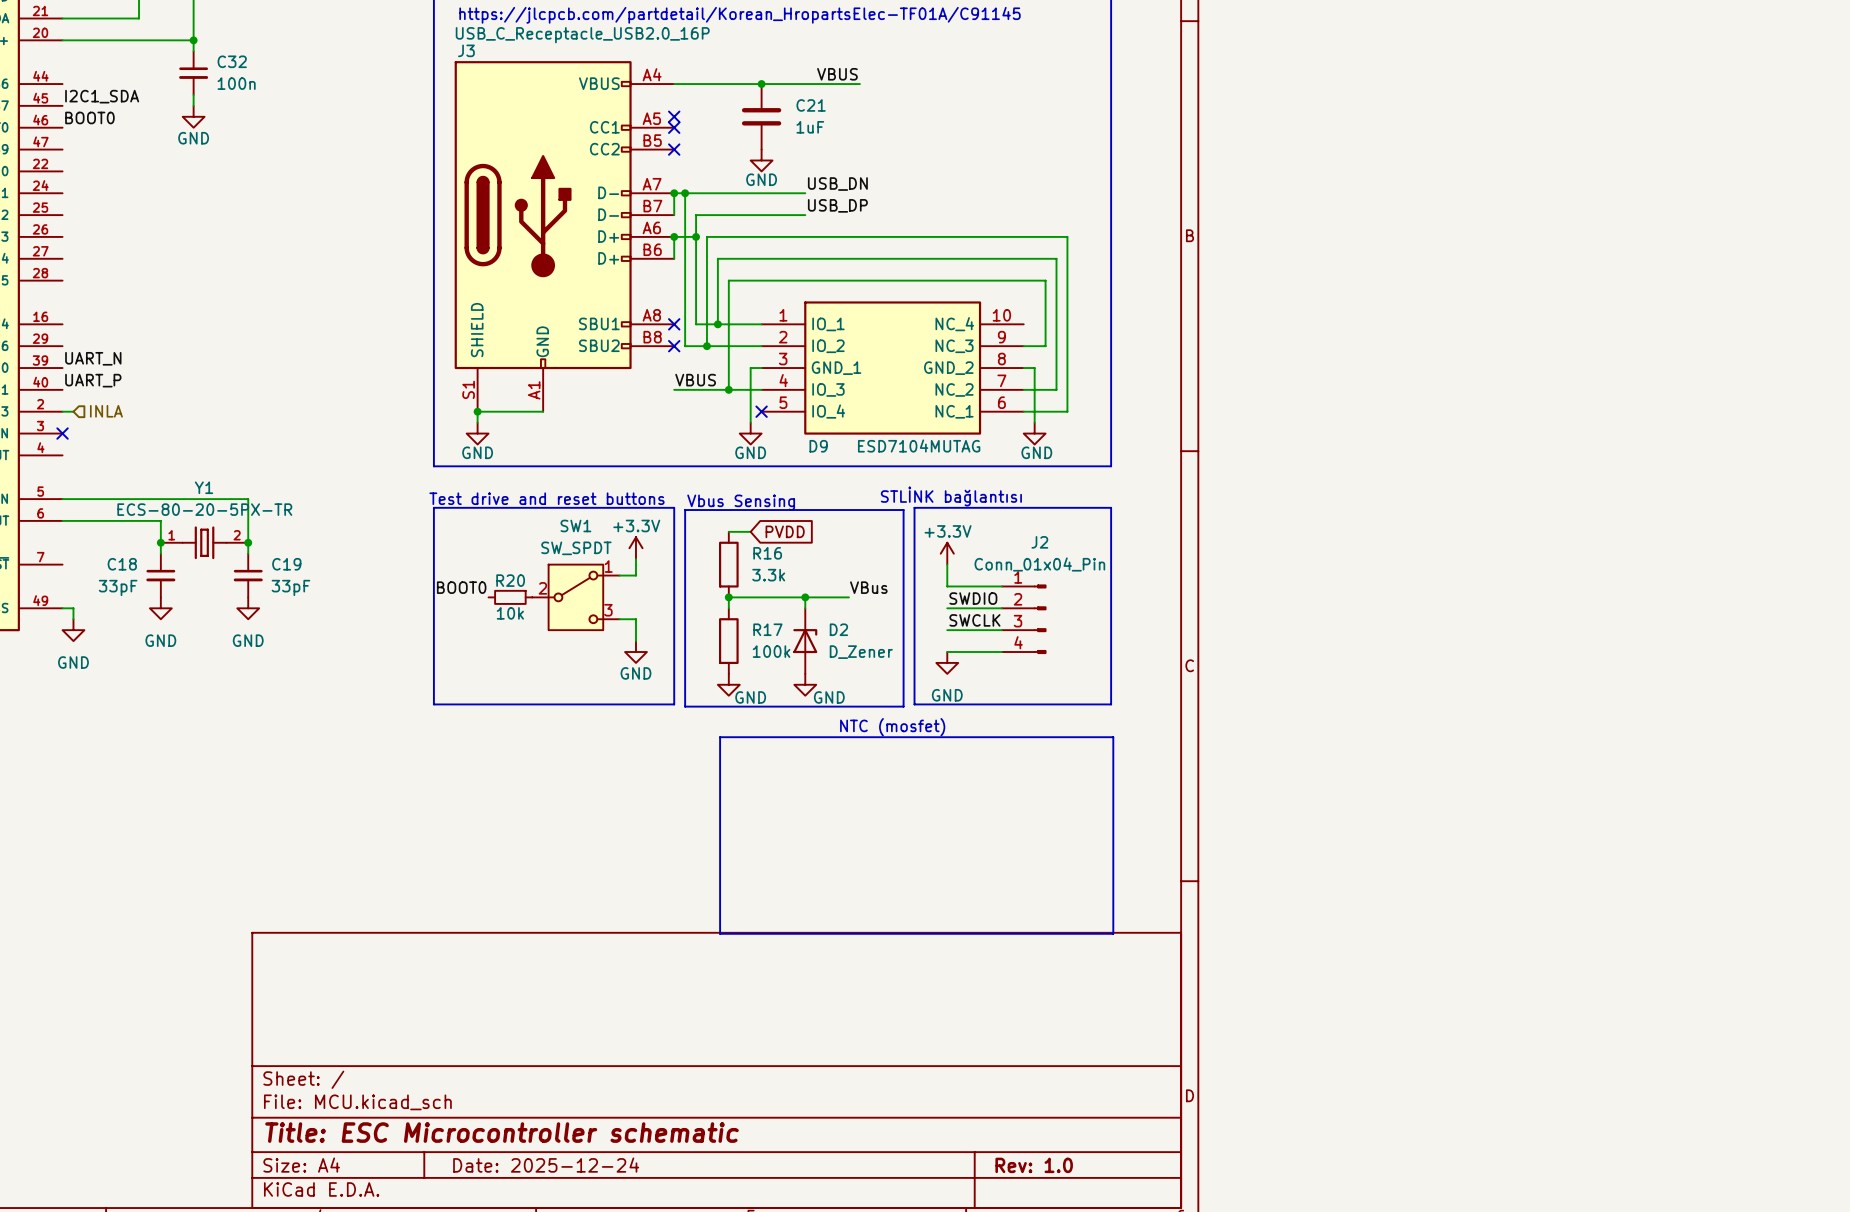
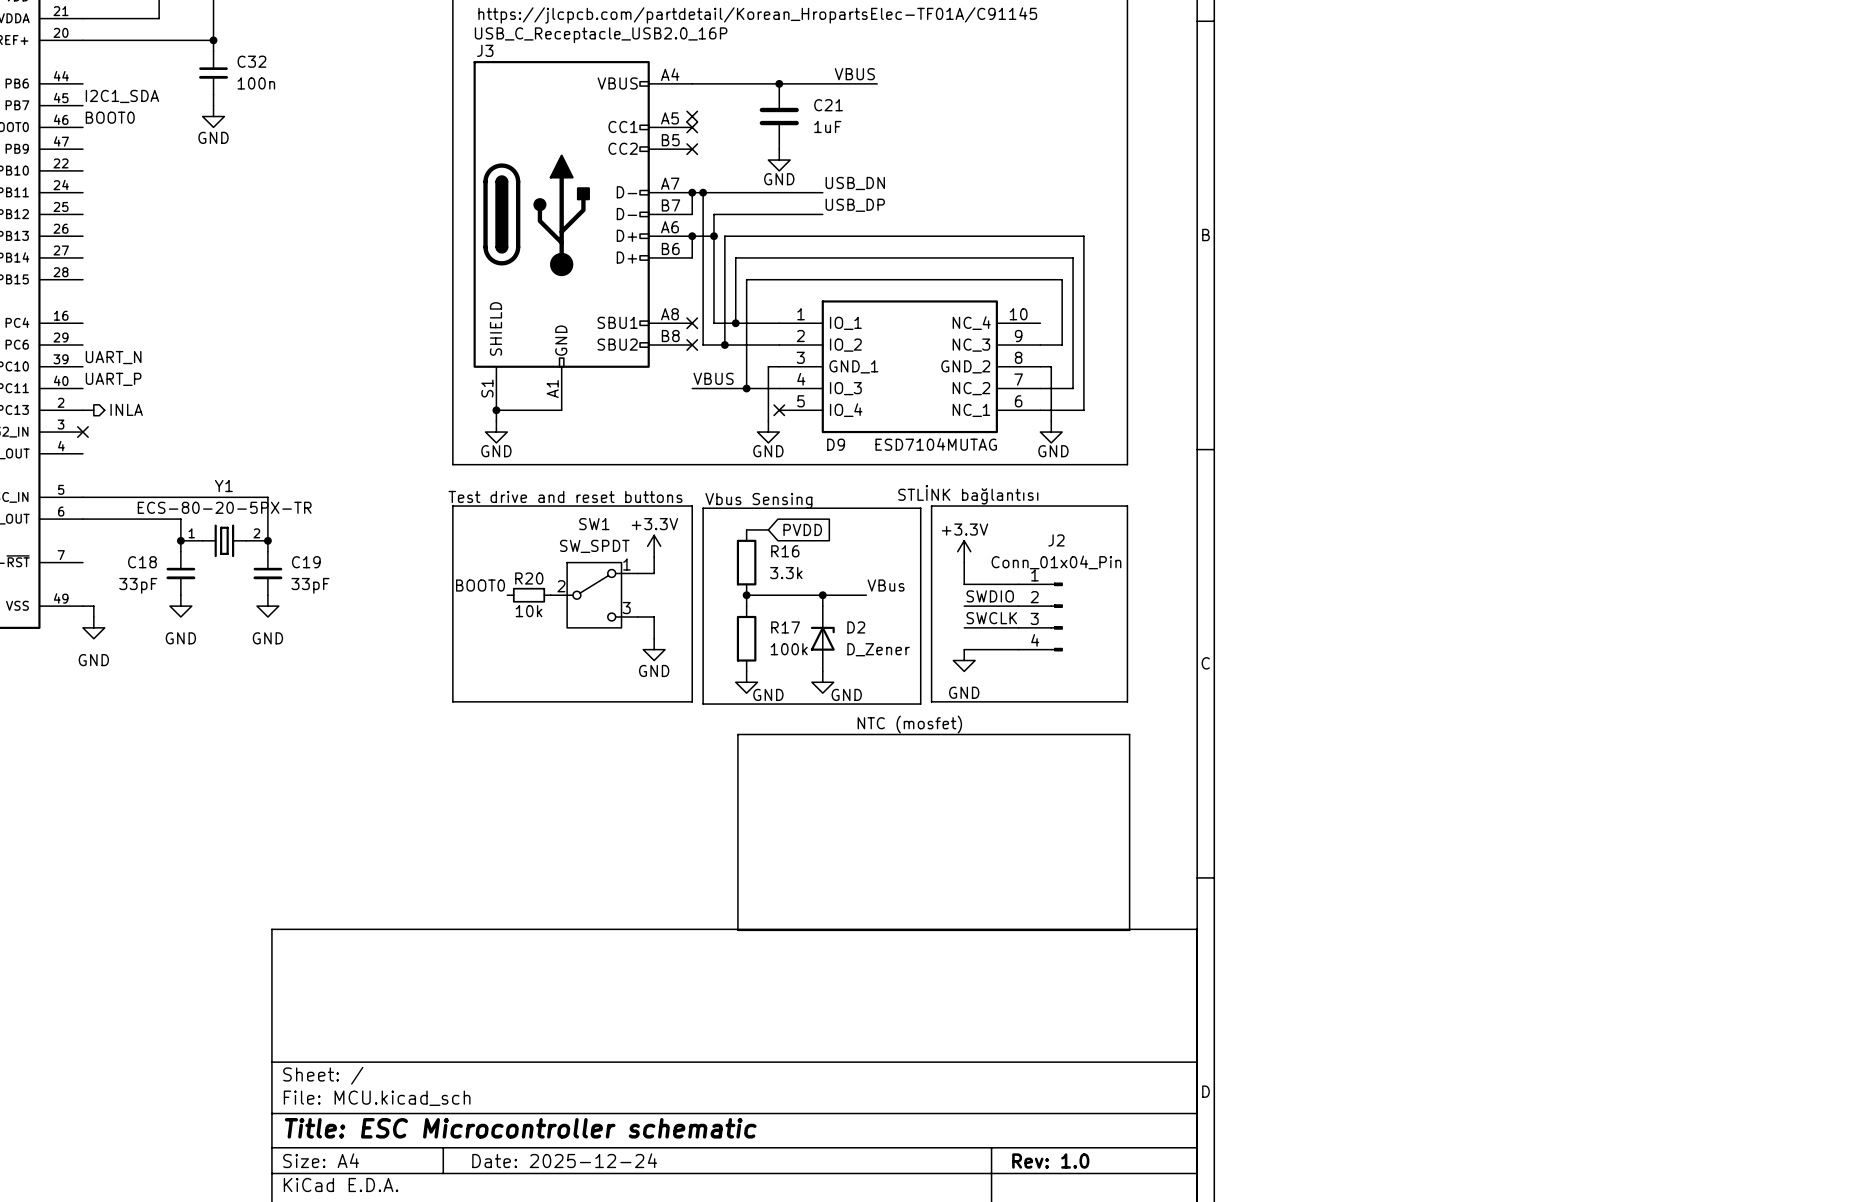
hierarchical label shape: input (106, 411) -> output (126, 409)

